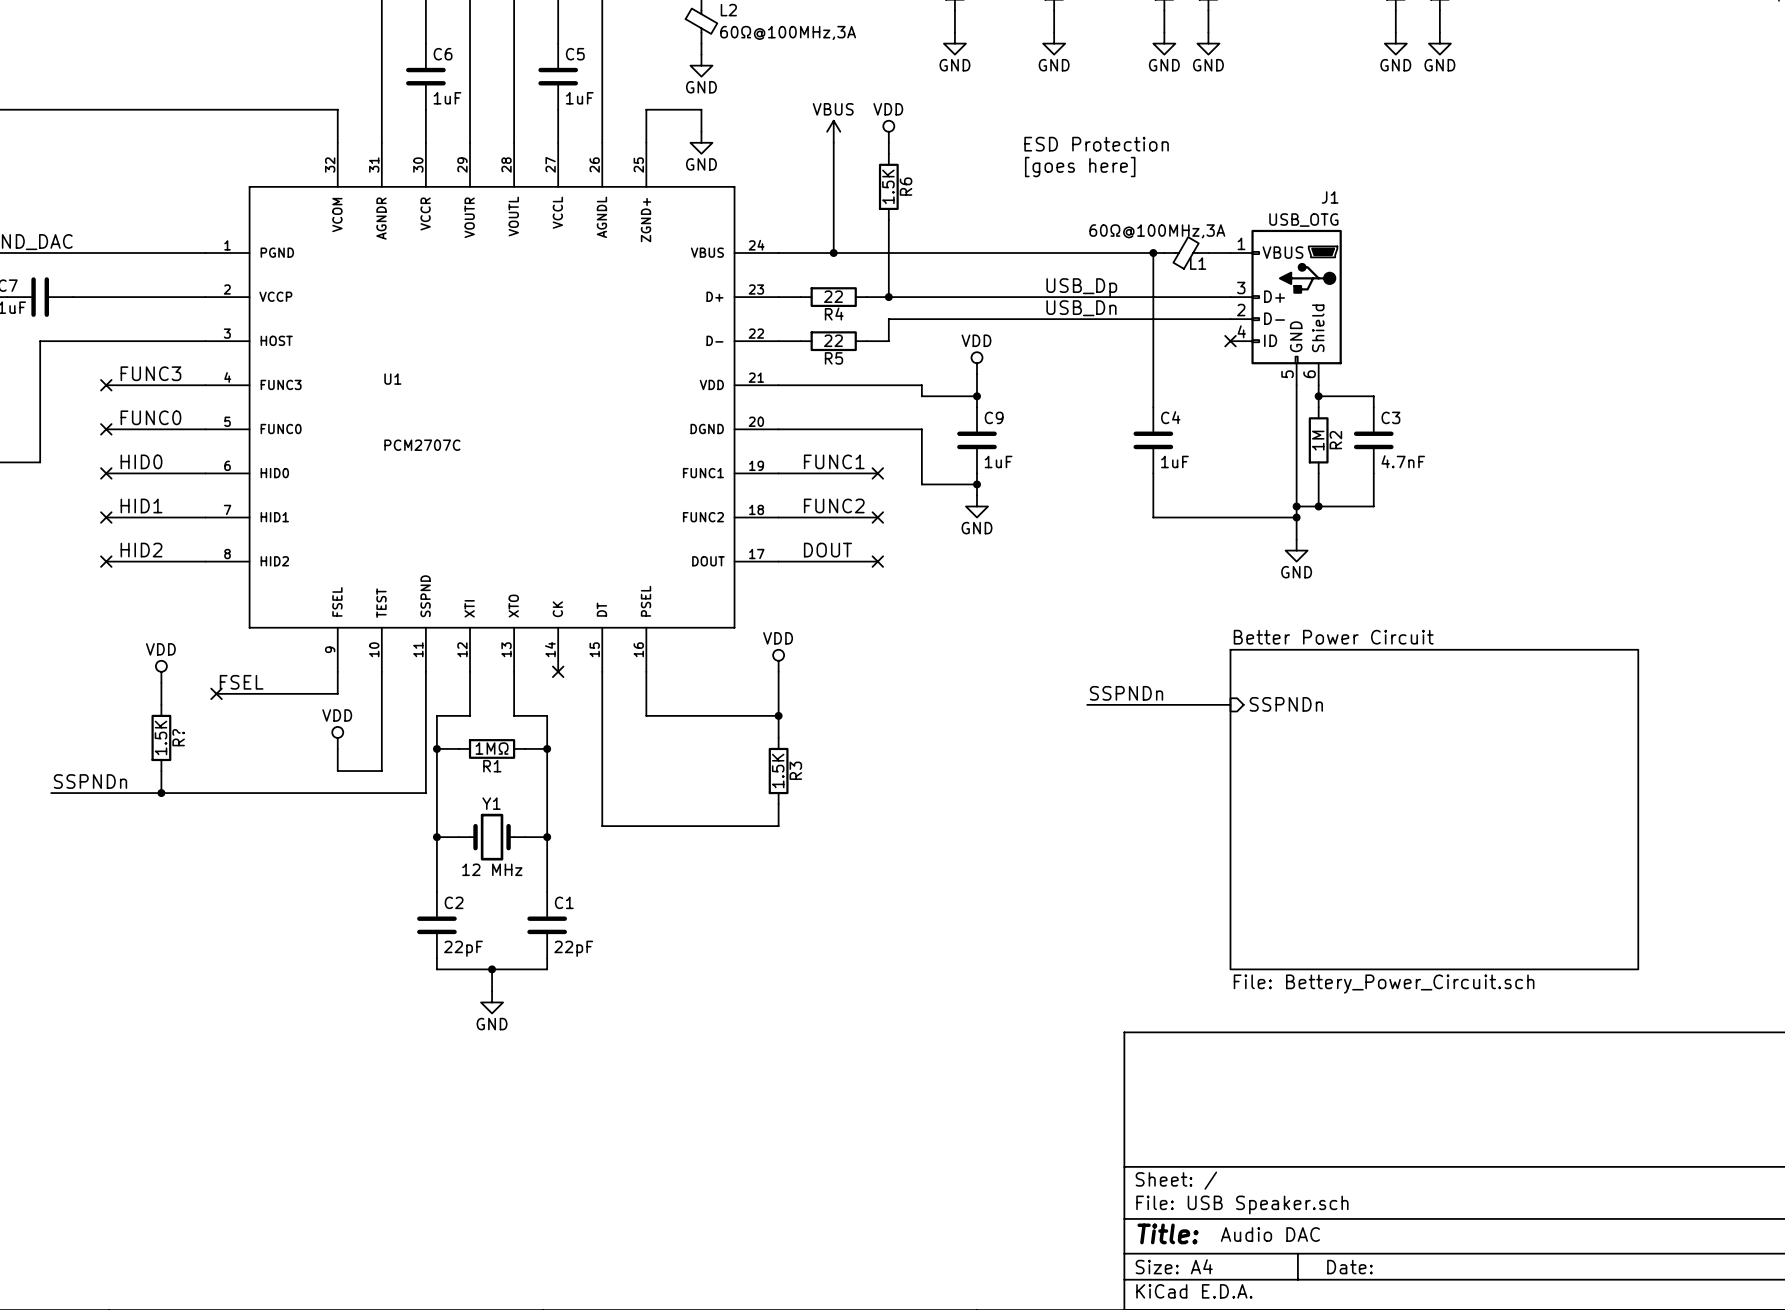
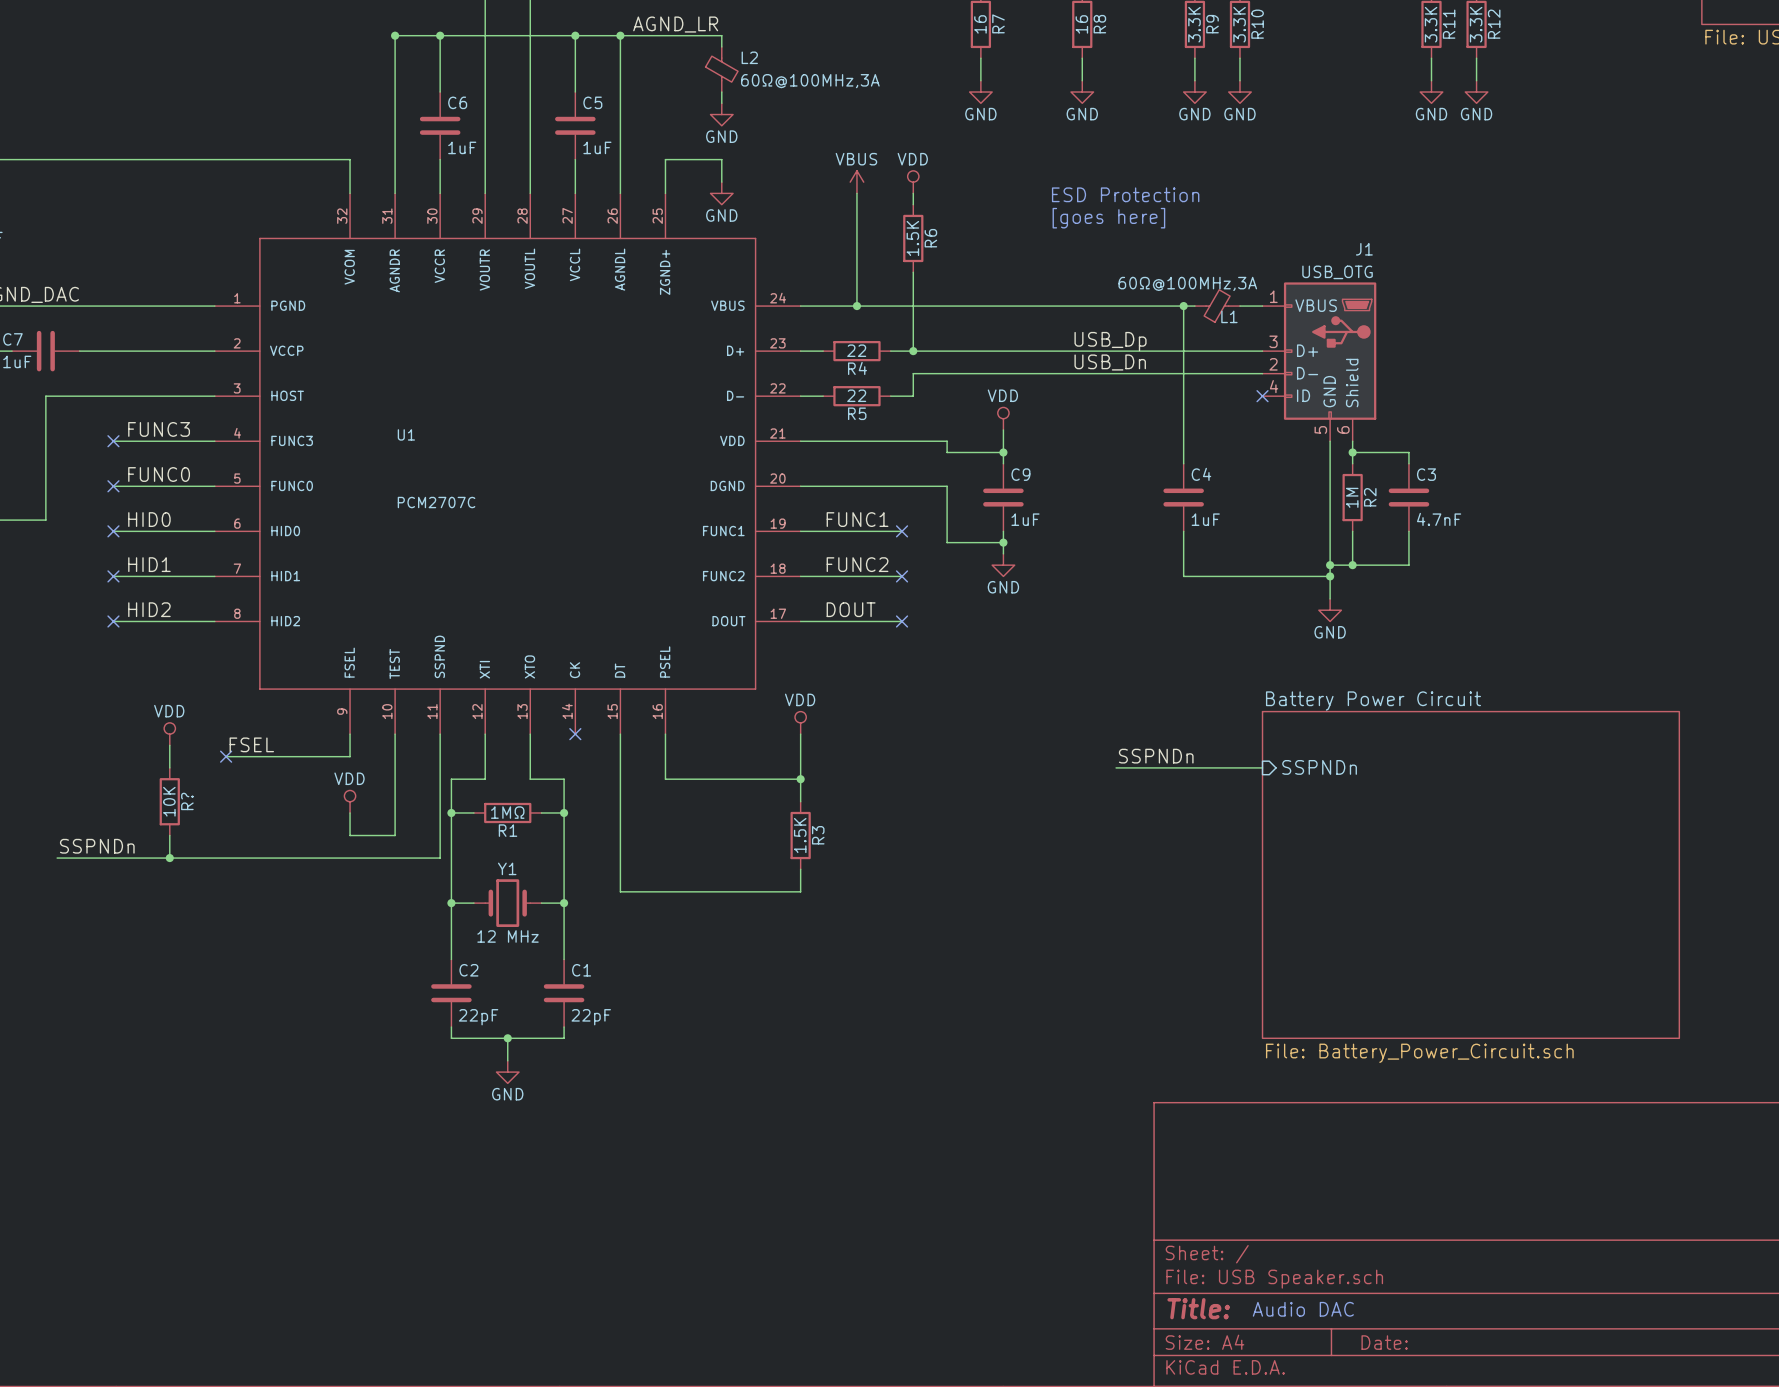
sheet Better Power Circuit name: Better Power Circuit (1333, 637) -> Battery Power Circuit (1373, 701)
R? value: 1.5K (160, 737) -> 10K (169, 801)
sheet Better Power Circuit value: File: Bettery_Power_Circuit.sch (1384, 984) -> File: Battery_Power_Circuit.sch (1419, 1053)

